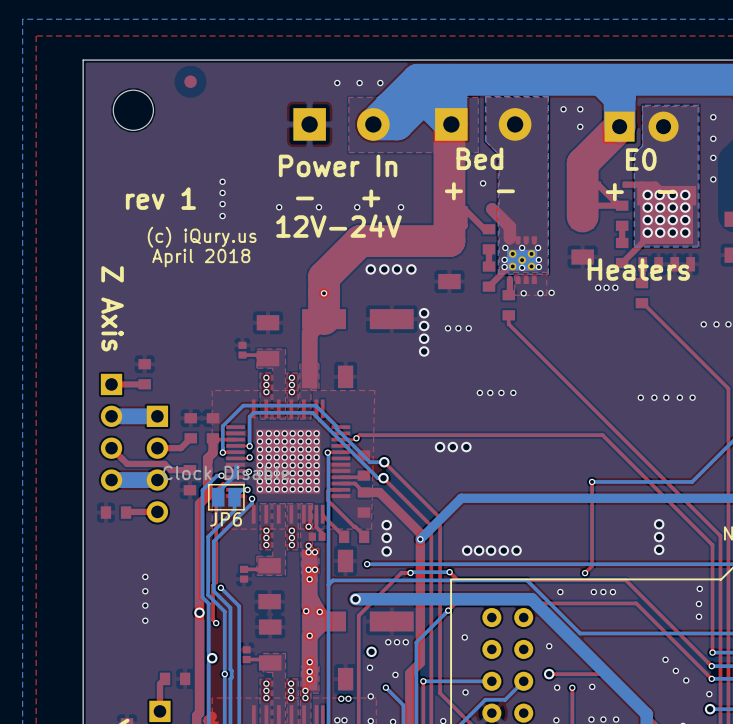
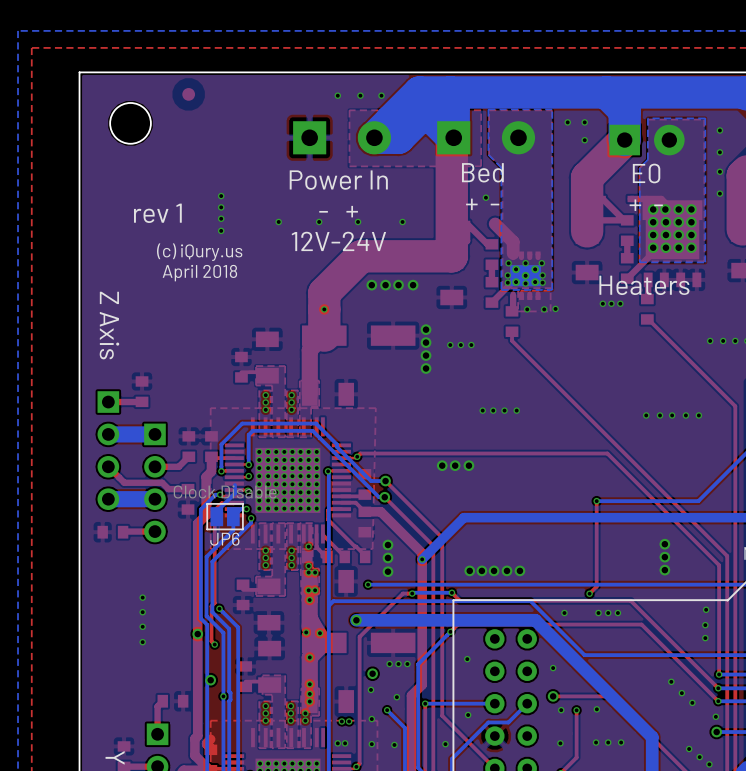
part footprint: [238, 341, 247, 359] -> [235, 351, 248, 383]
part footprint: [308, 532, 326, 541] -> [301, 550, 333, 564]
part footprint: [240, 565, 249, 583] -> [236, 579, 250, 611]
part footprint: [242, 646, 251, 664] -> [239, 661, 253, 693]

